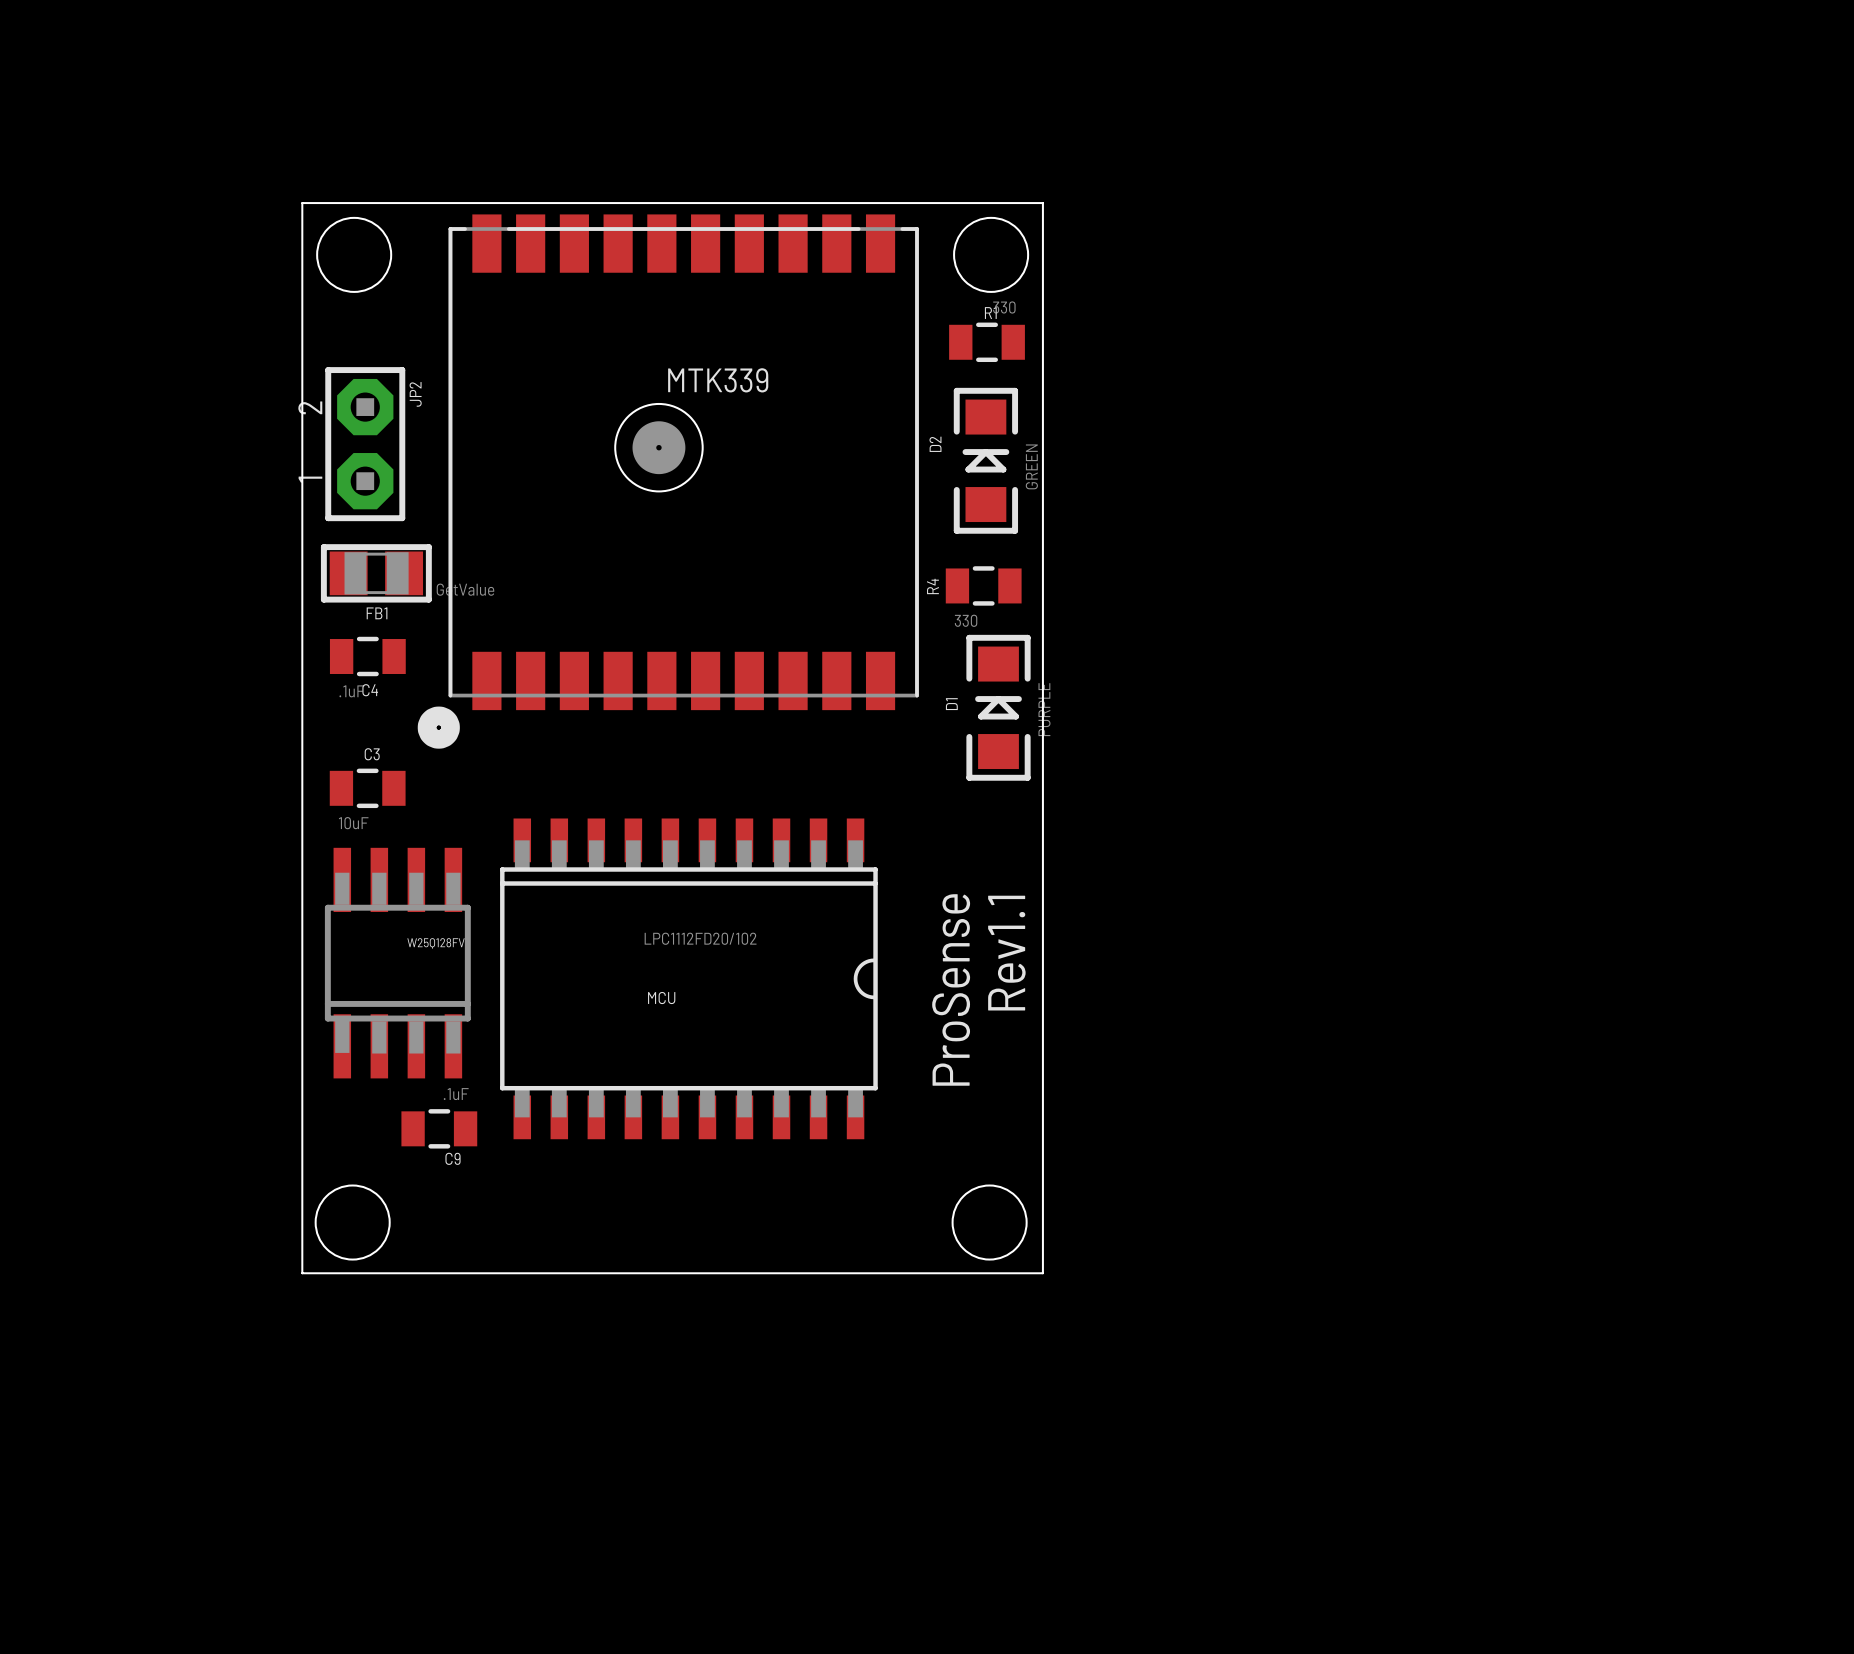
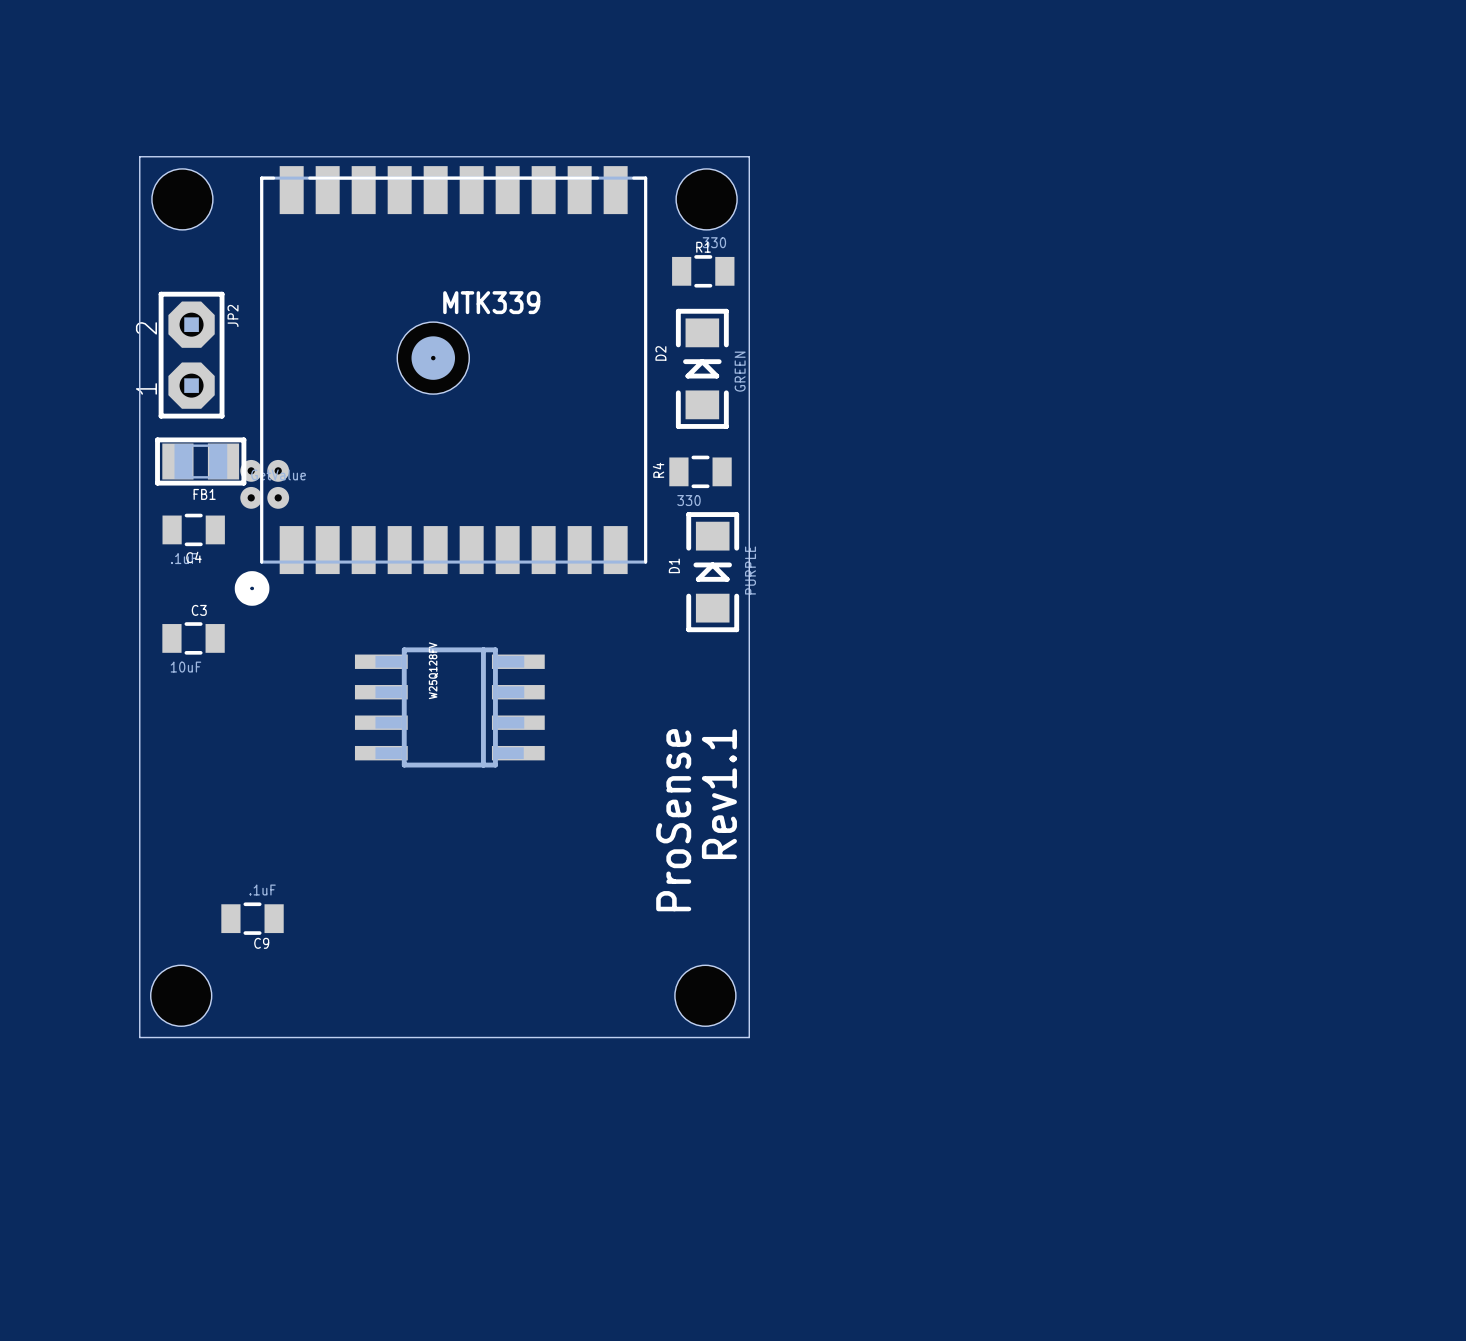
part: none -> (264, 484)
W25Q128FV rotation: 0° (397, 963) -> 90° counterclockwise (449, 707)
W25Q128FV position: (397, 963) -> (449, 707)
MCU: LPC1112FD20/102 (688, 978) -> none

